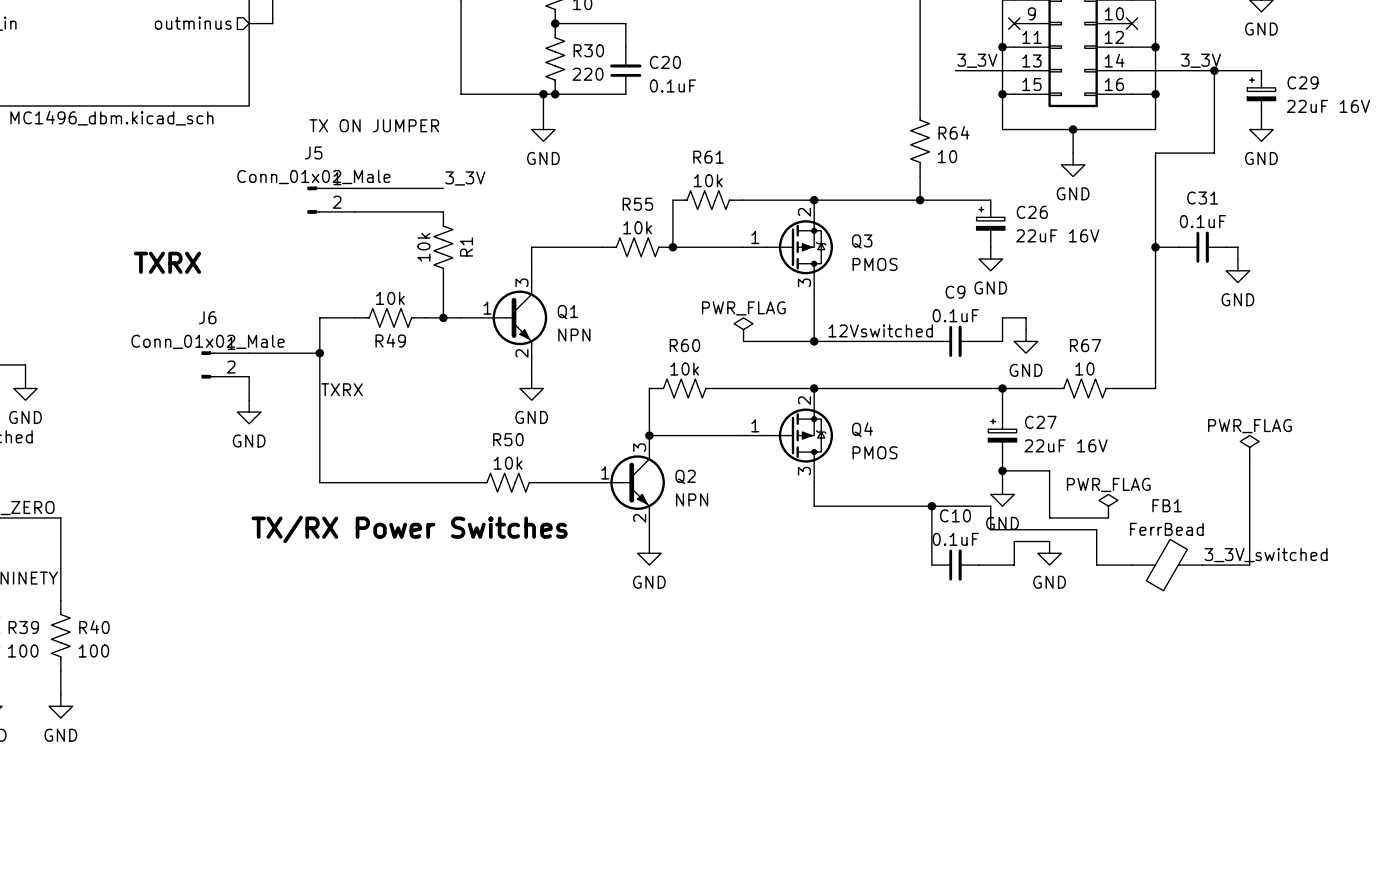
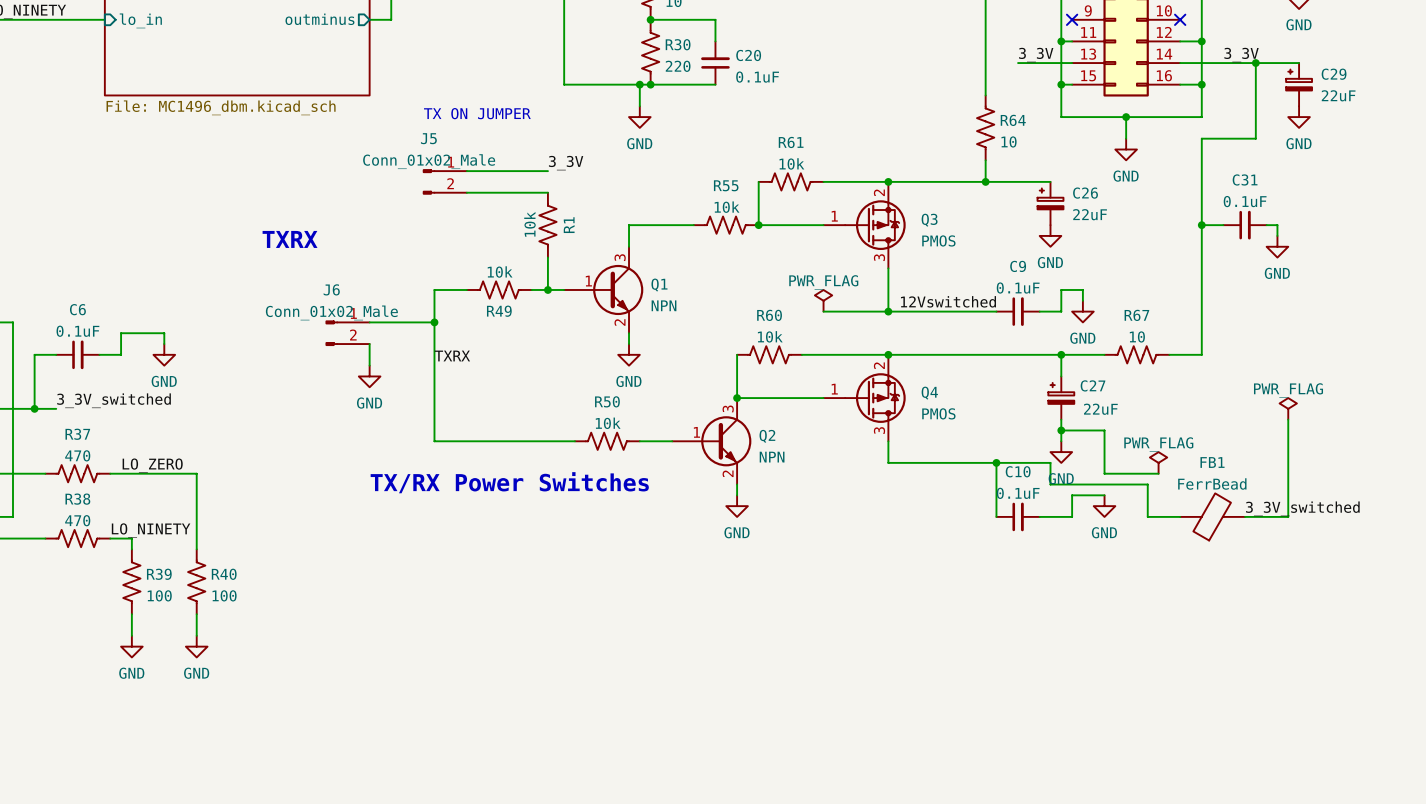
C29 value: 22uF 16V (1328, 106) -> 22uF (1338, 95)
C26 value: 22uF 16V (1057, 235) -> 22uF (1090, 214)
C27 value: 22uF 16V (1066, 445) -> 22uF (1100, 409)

